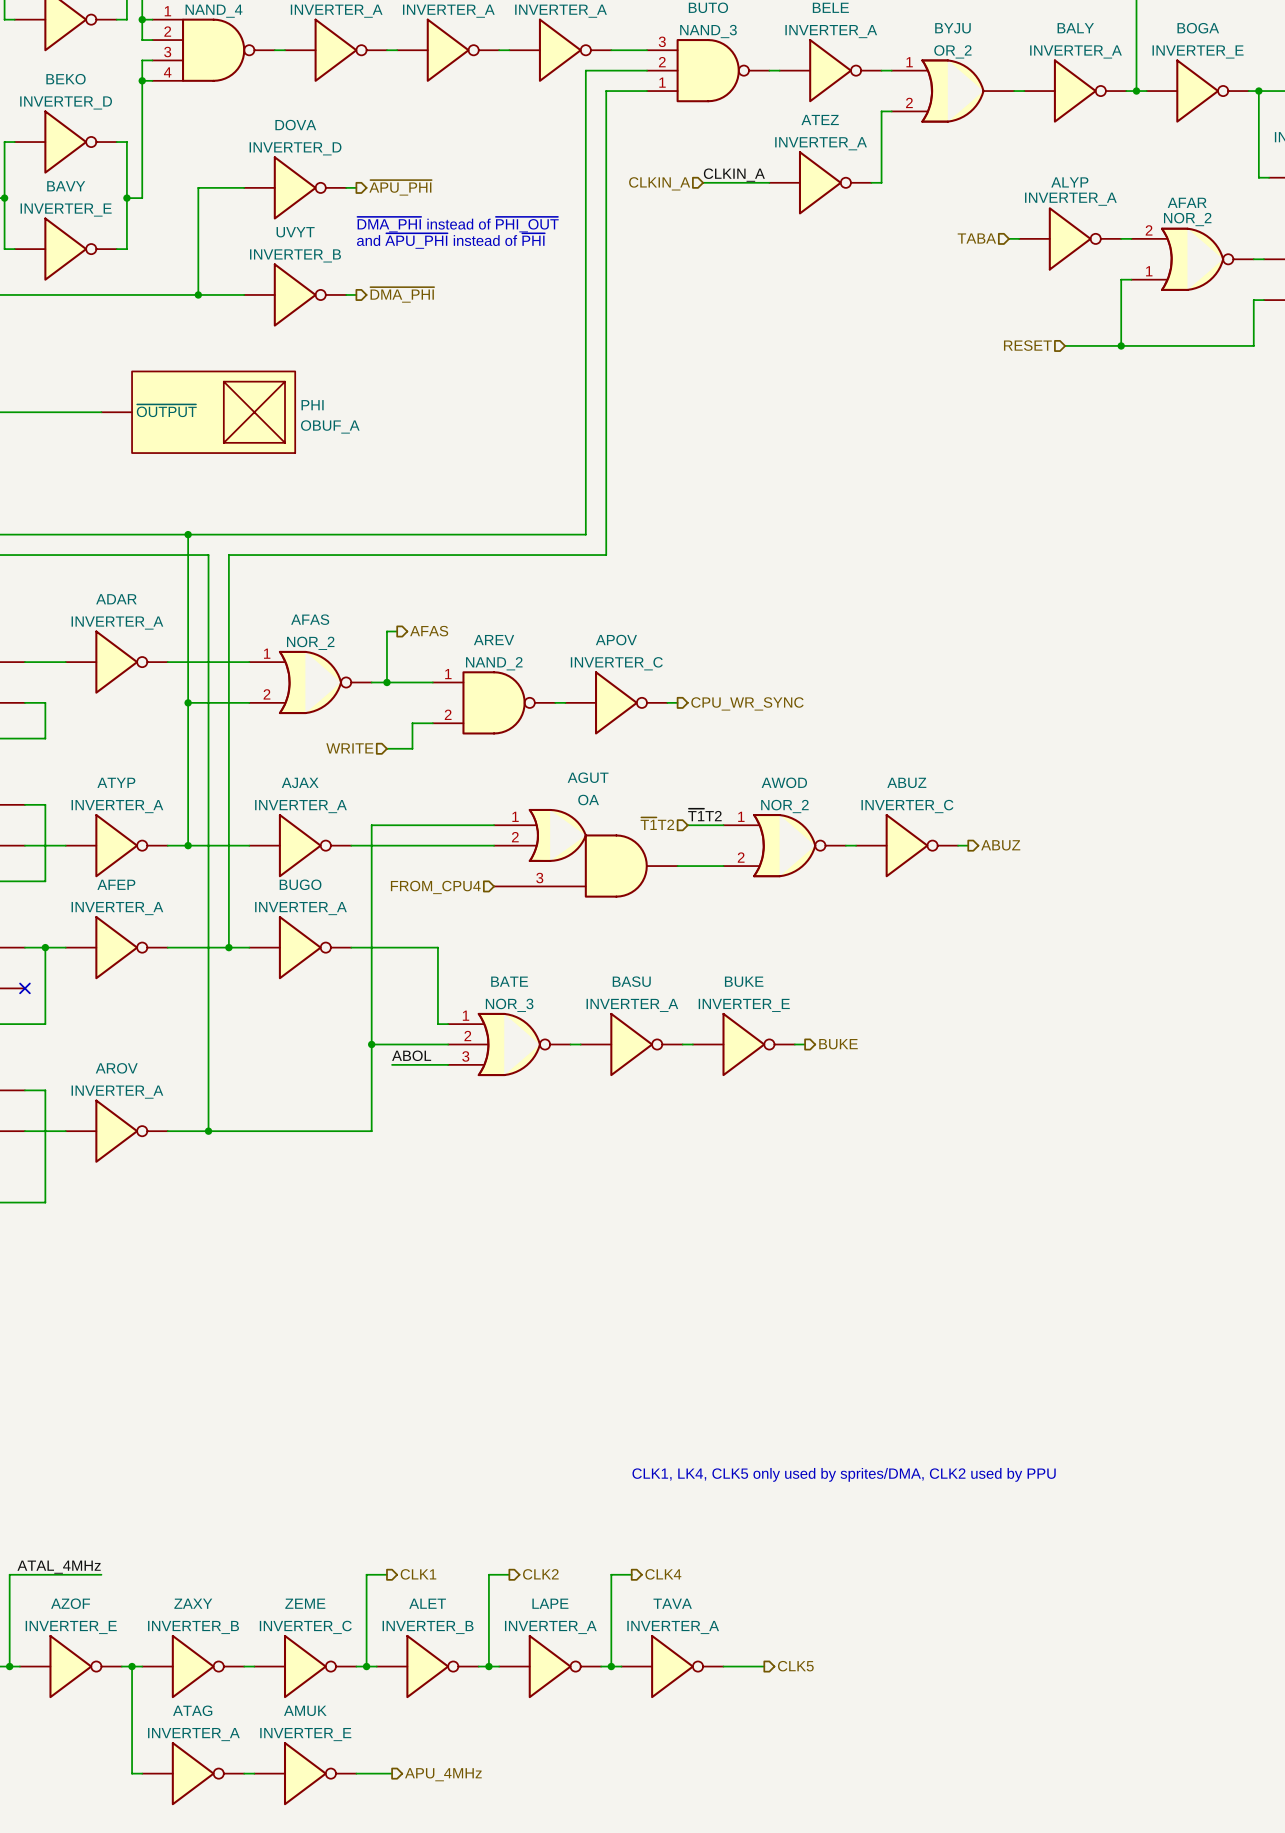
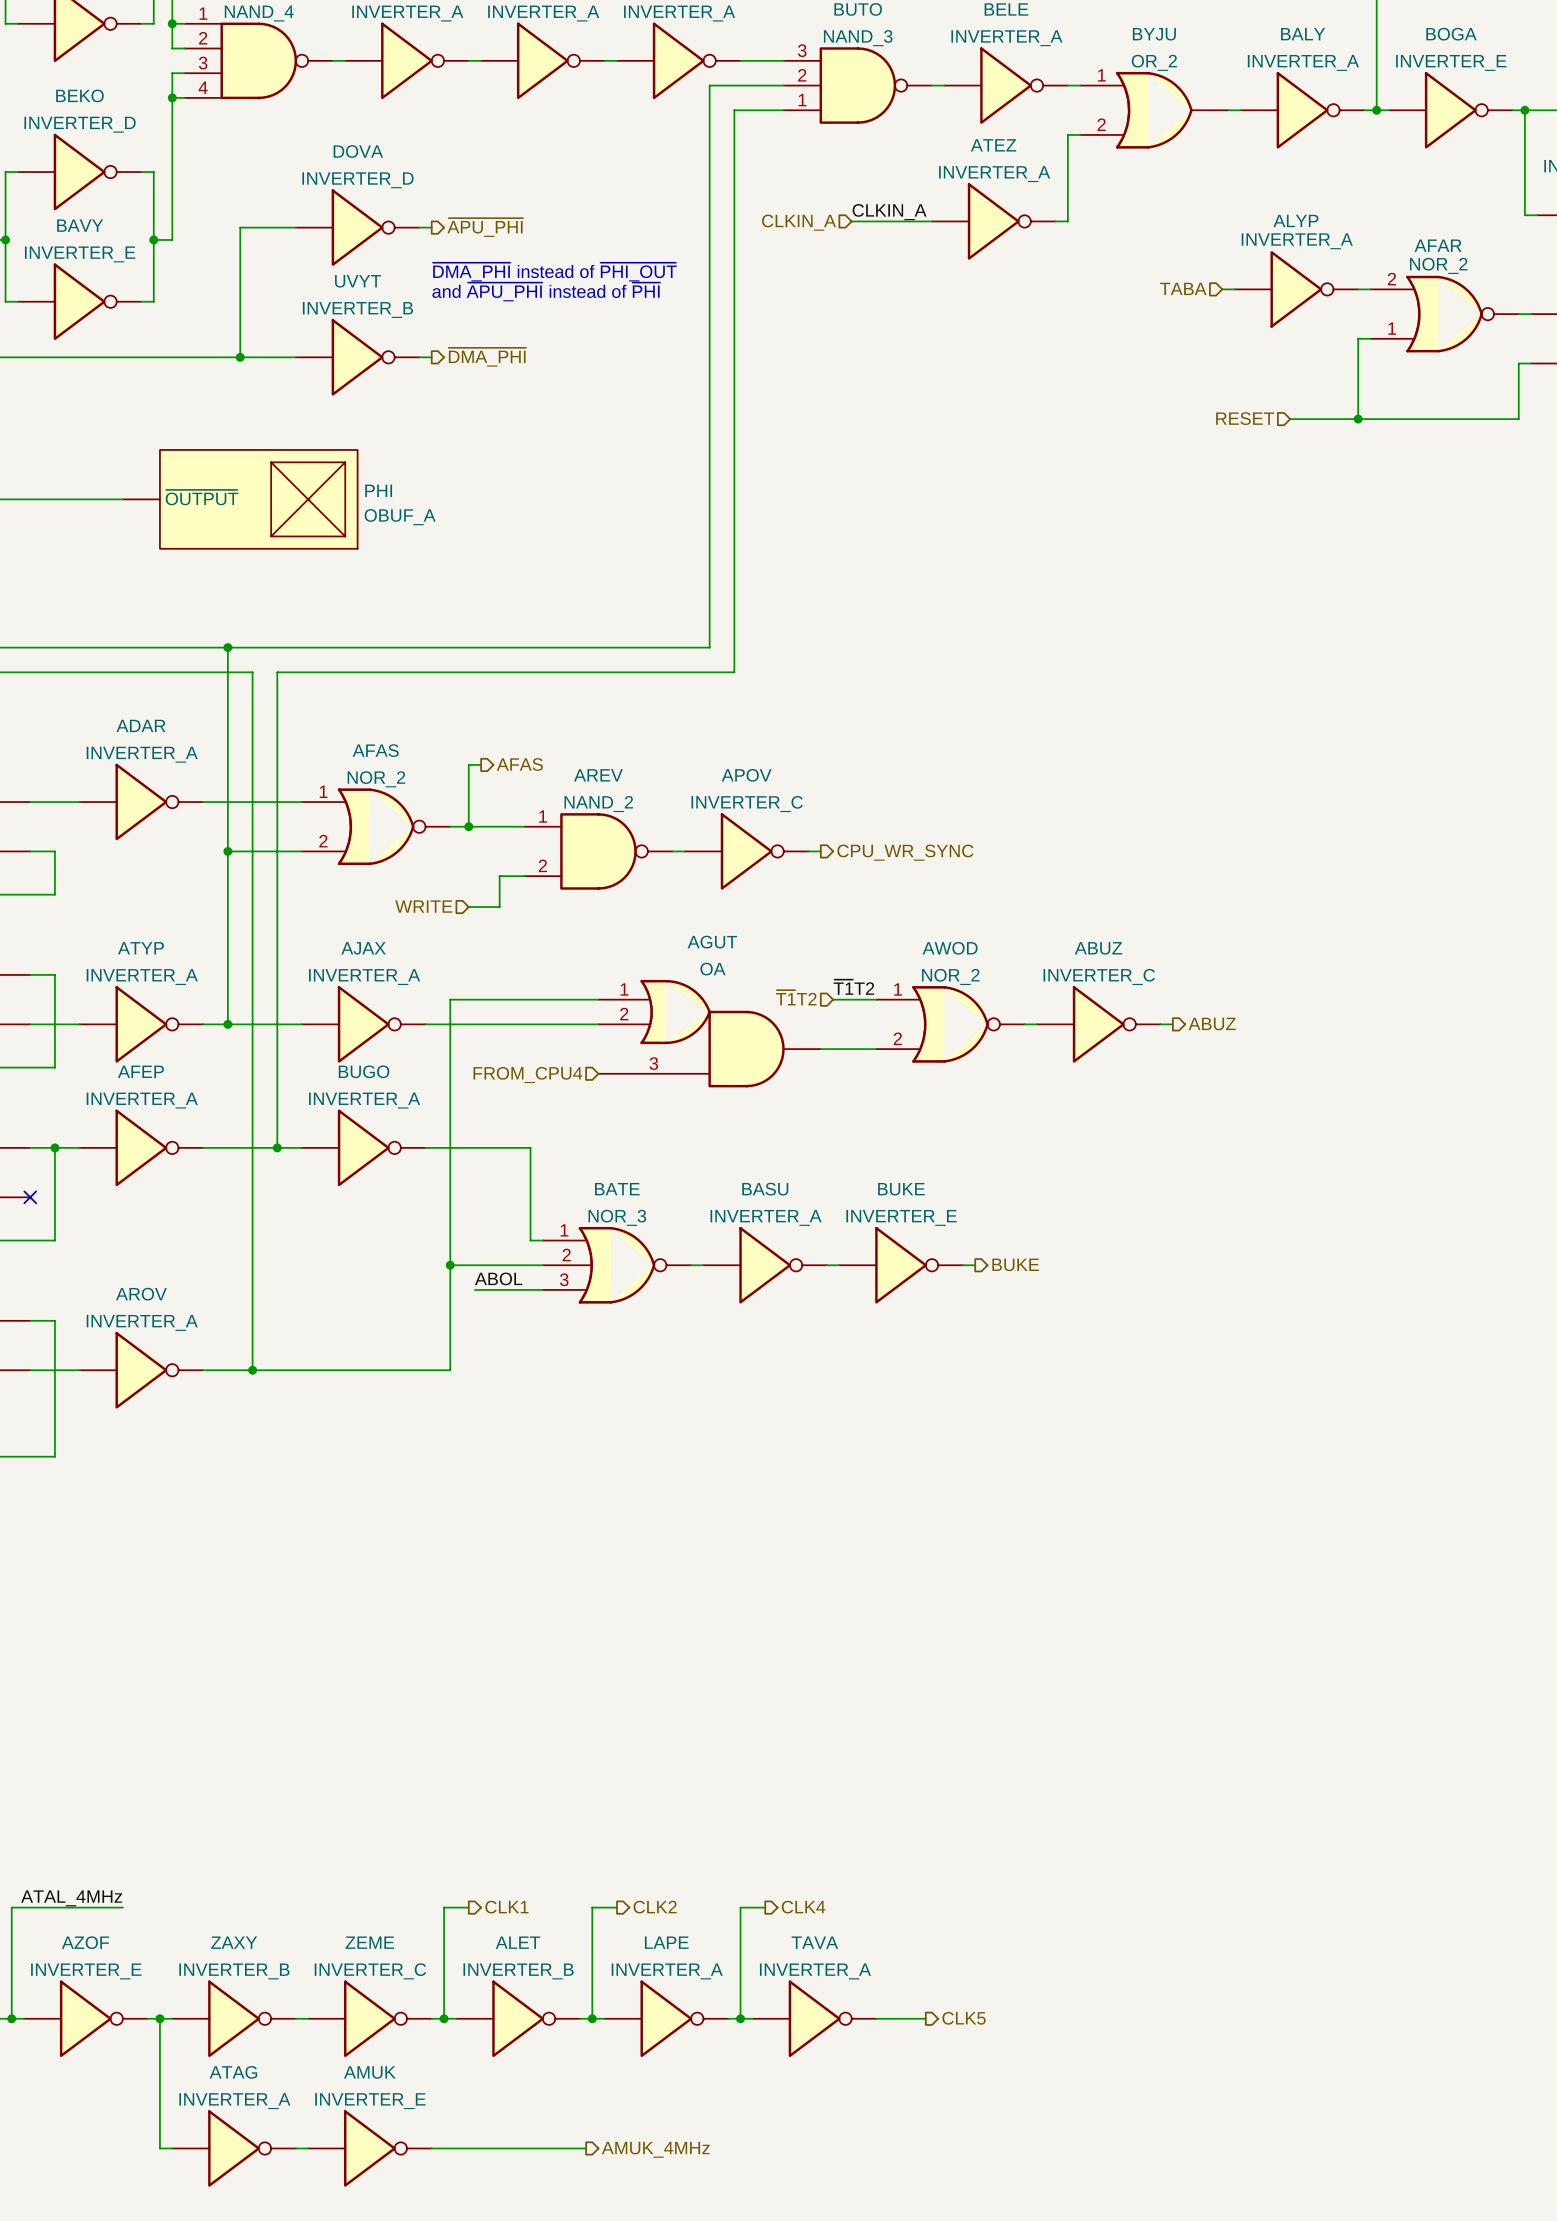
text: CLK1, LK4, CLK5 only used by sprites/DMA, CLK2 used by PPU (844, 1474) -> none
wire: none -> (474, 2148) (586, 2148)
hierarchical label: APU_4MHz (443, 1774) -> none
hierarchical label: none -> AMUK_4MHz (655, 2149)

